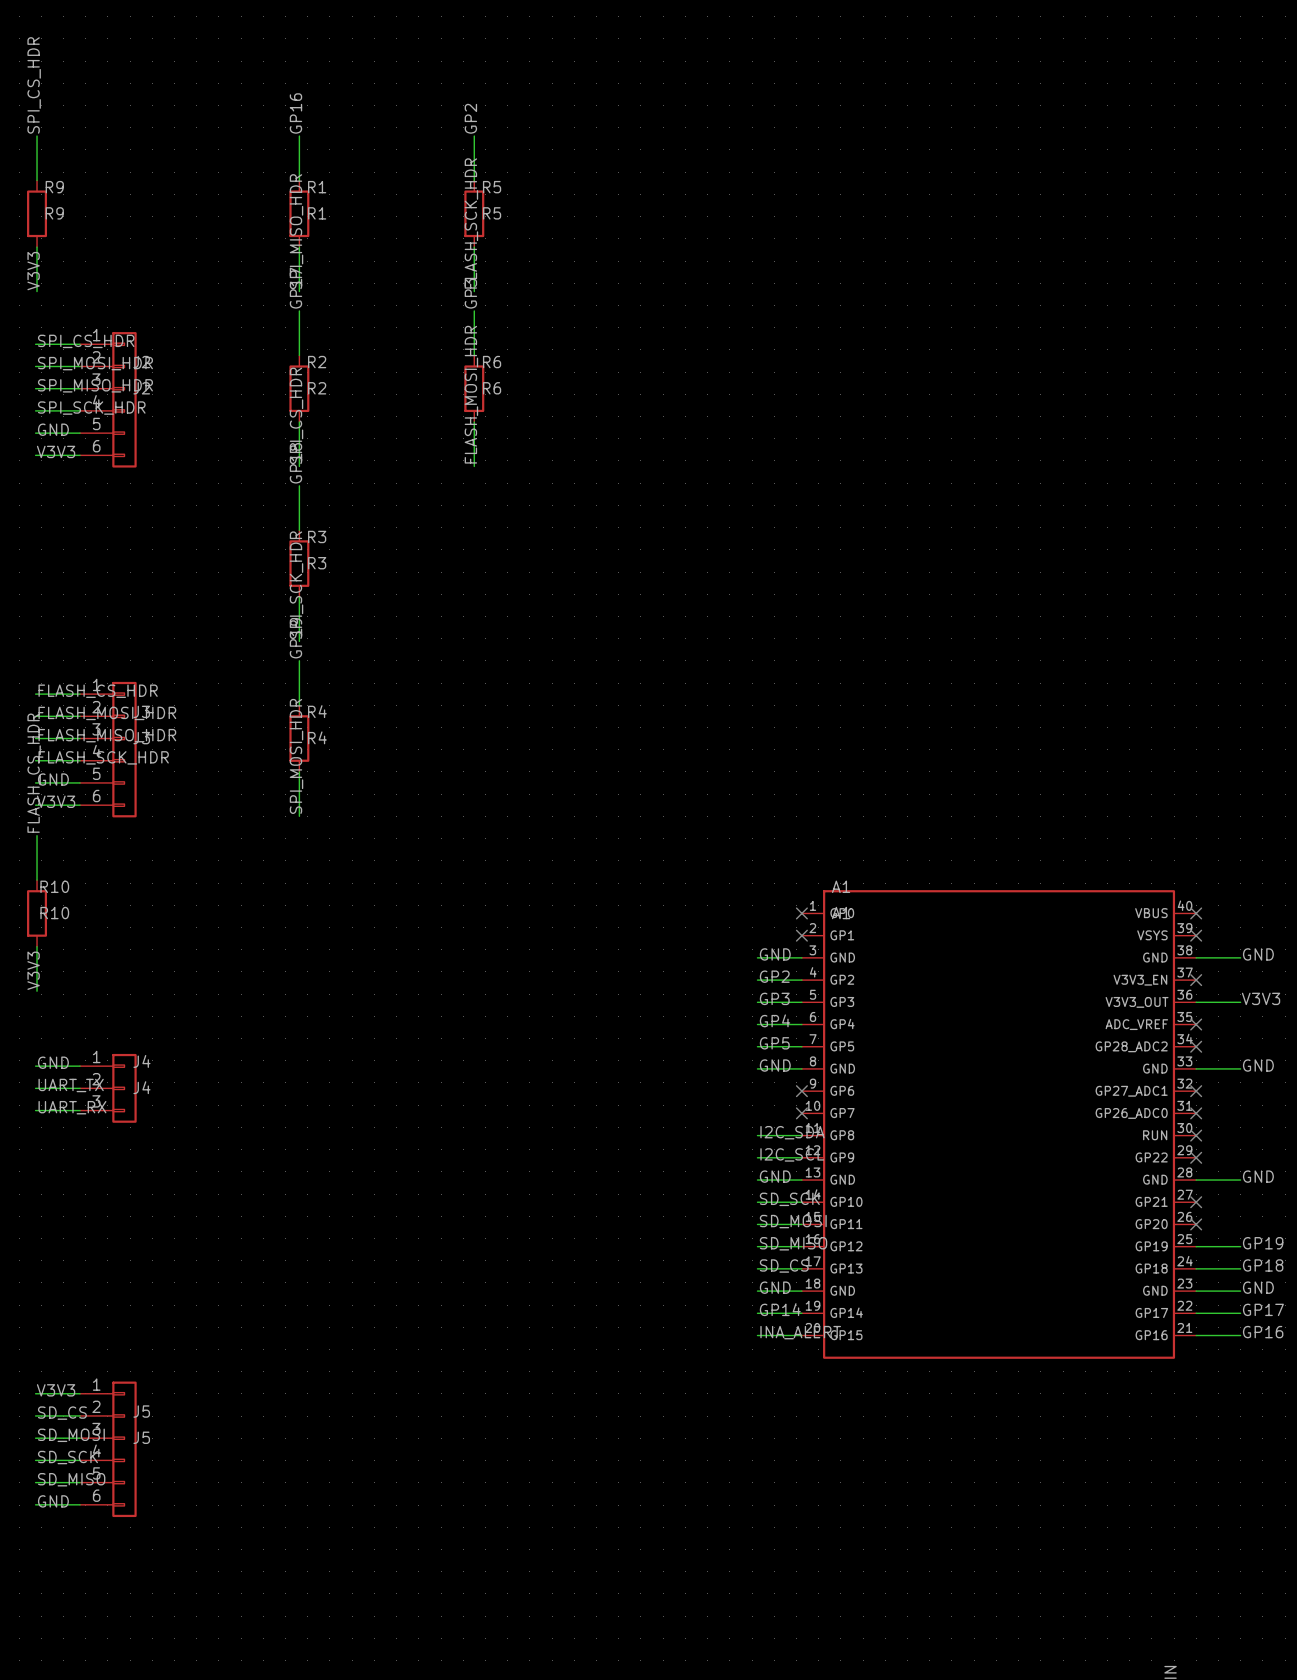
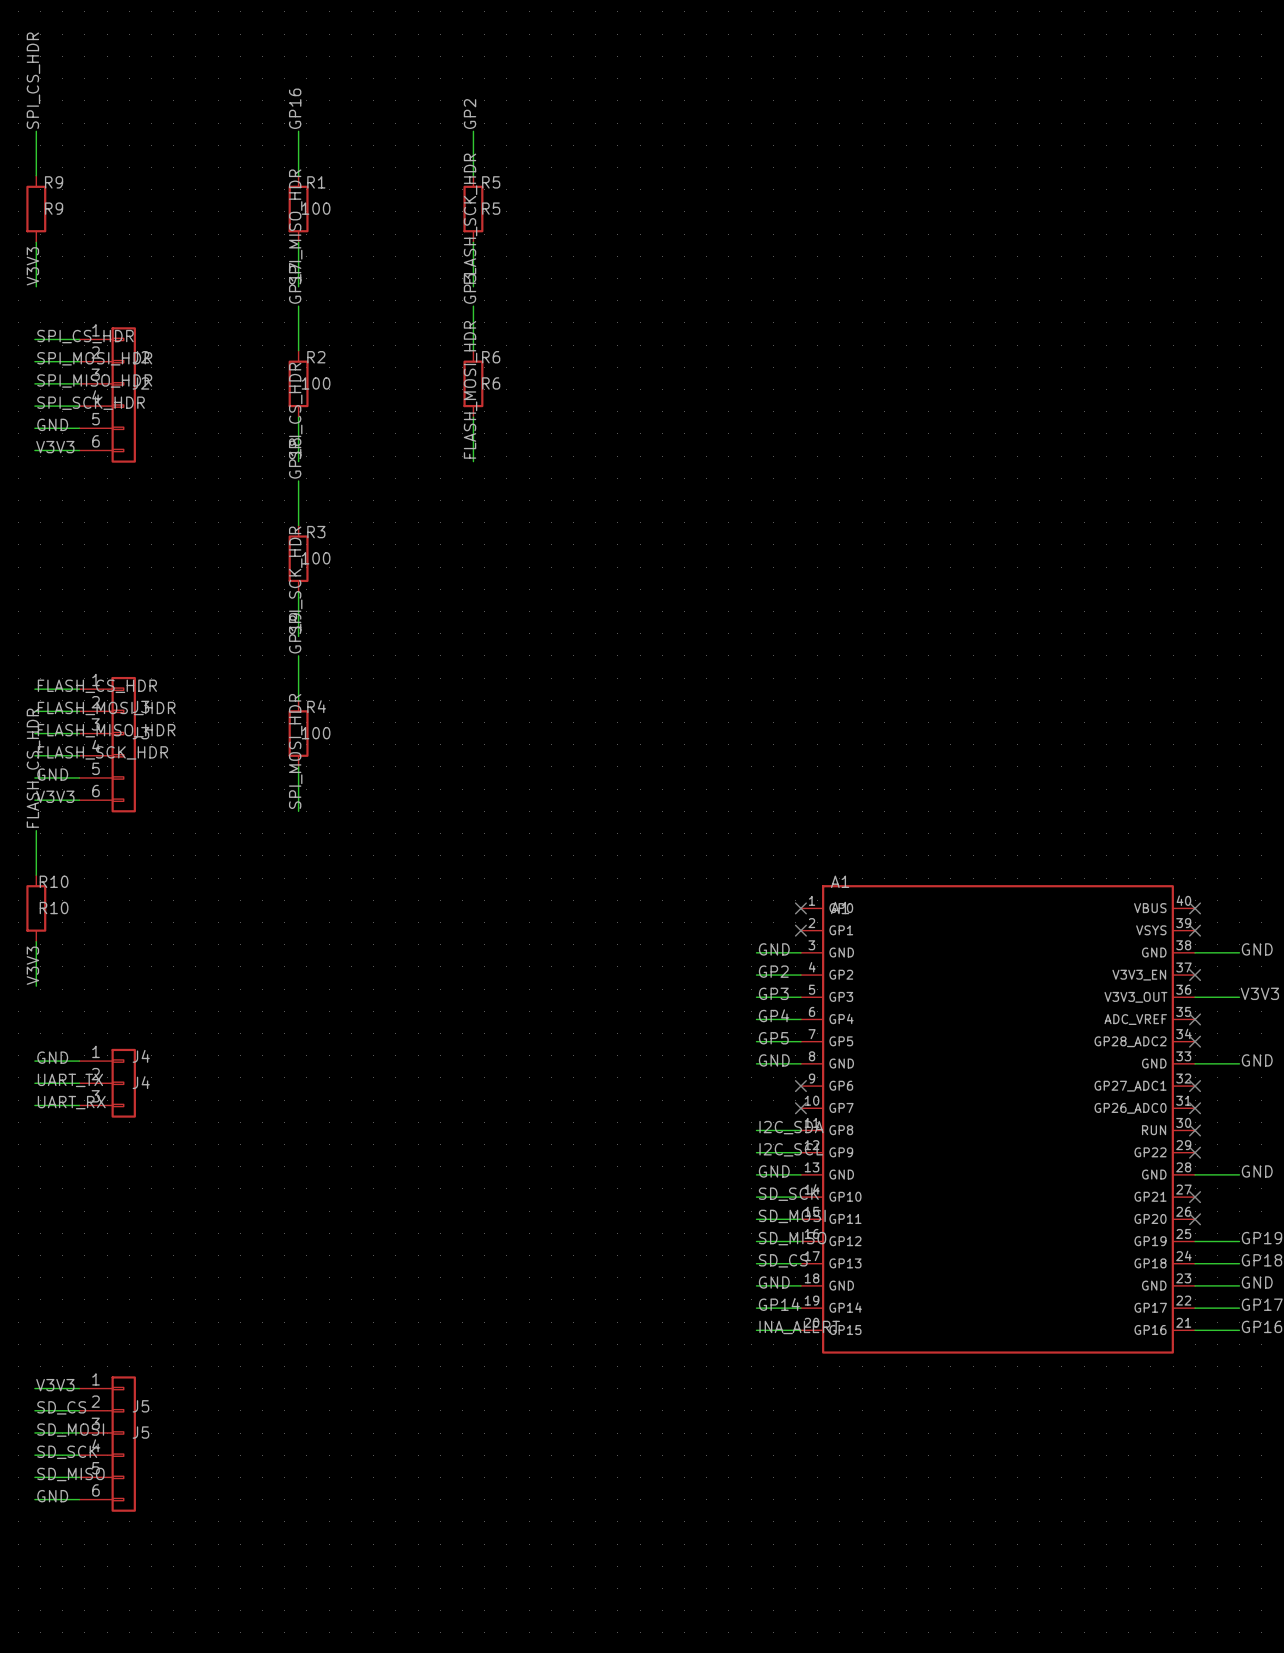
R1 value: R1 (317, 213) -> 100 (316, 208)
R2 value: R2 (317, 388) -> 100 (316, 383)
R3 value: R3 (317, 563) -> 100 (316, 558)
R4 value: R4 (317, 737) -> 100 (316, 733)

